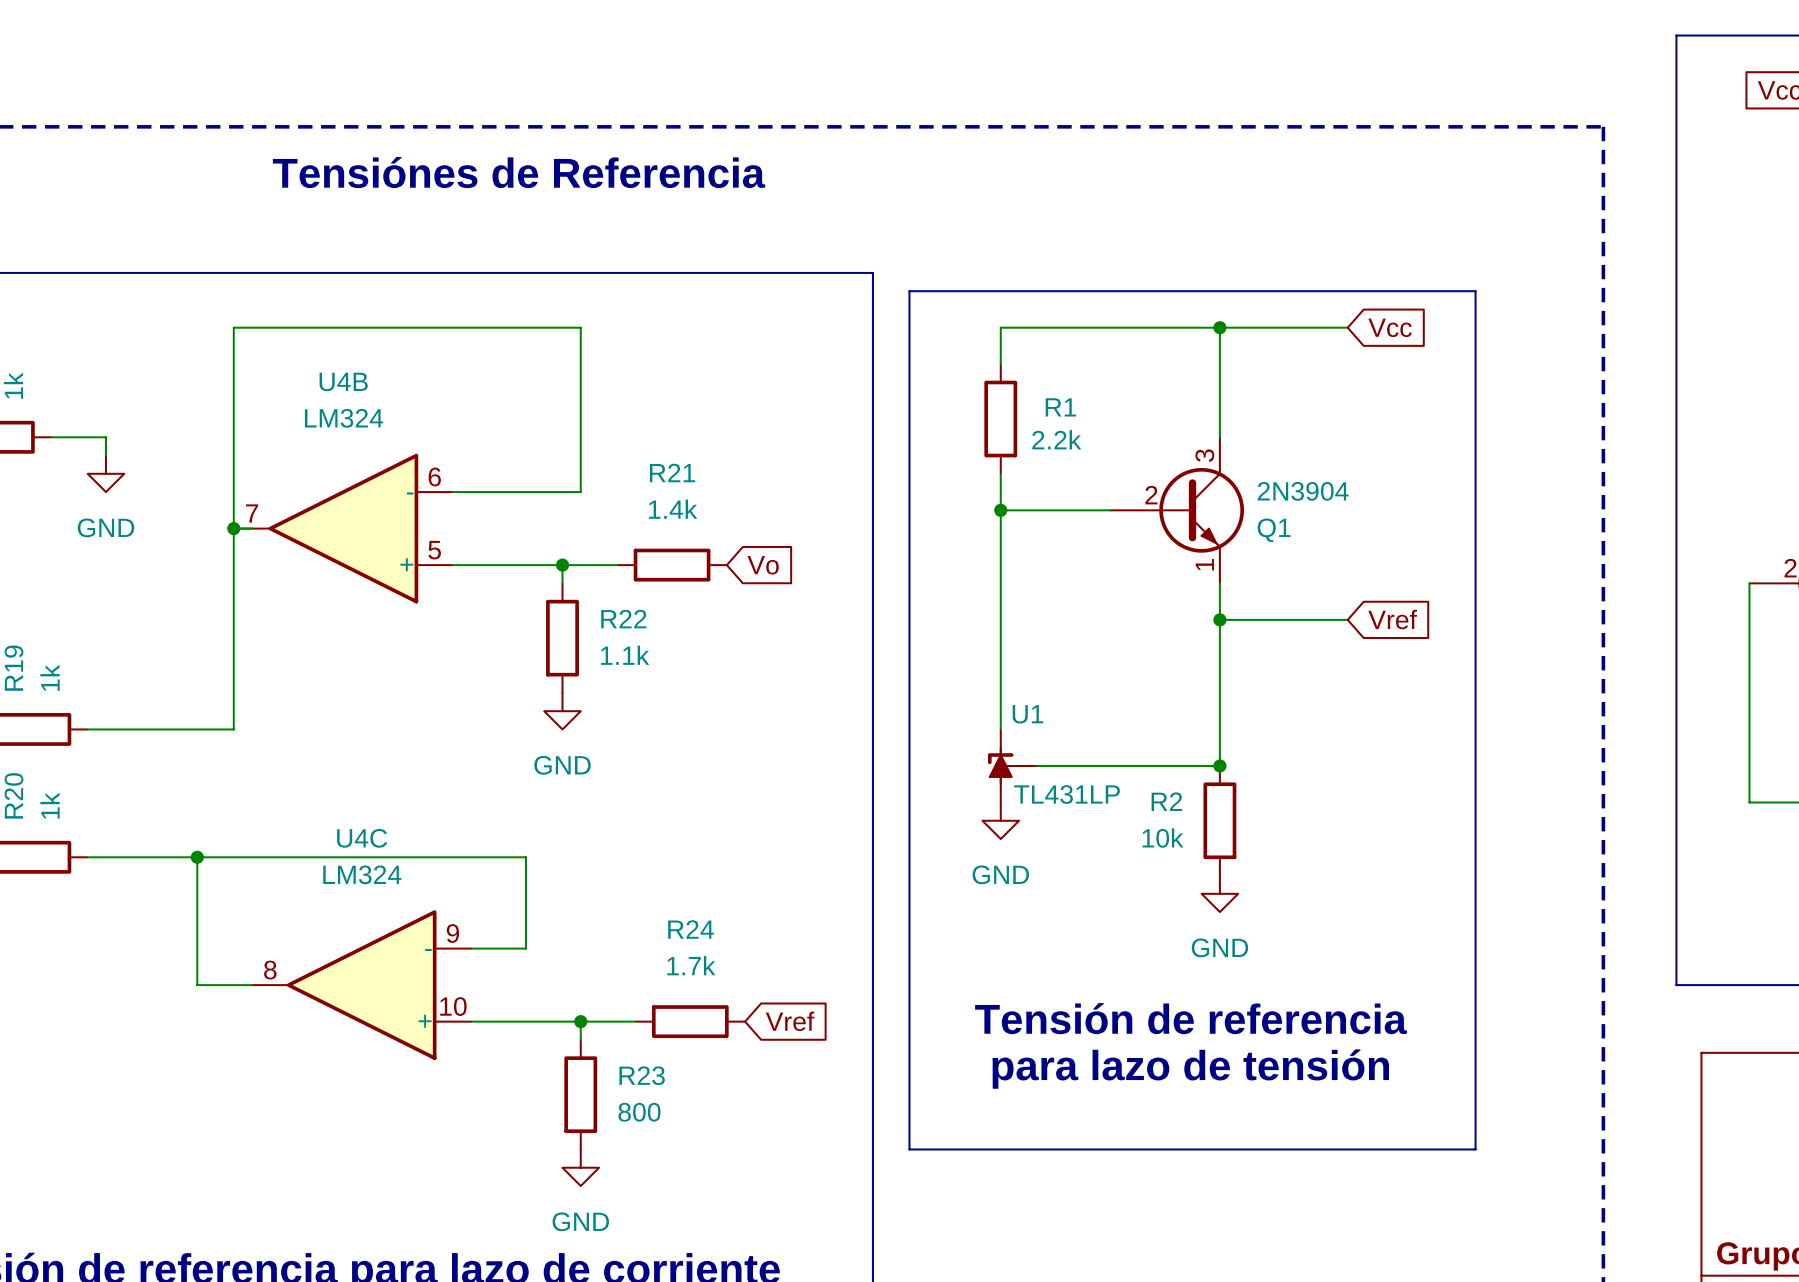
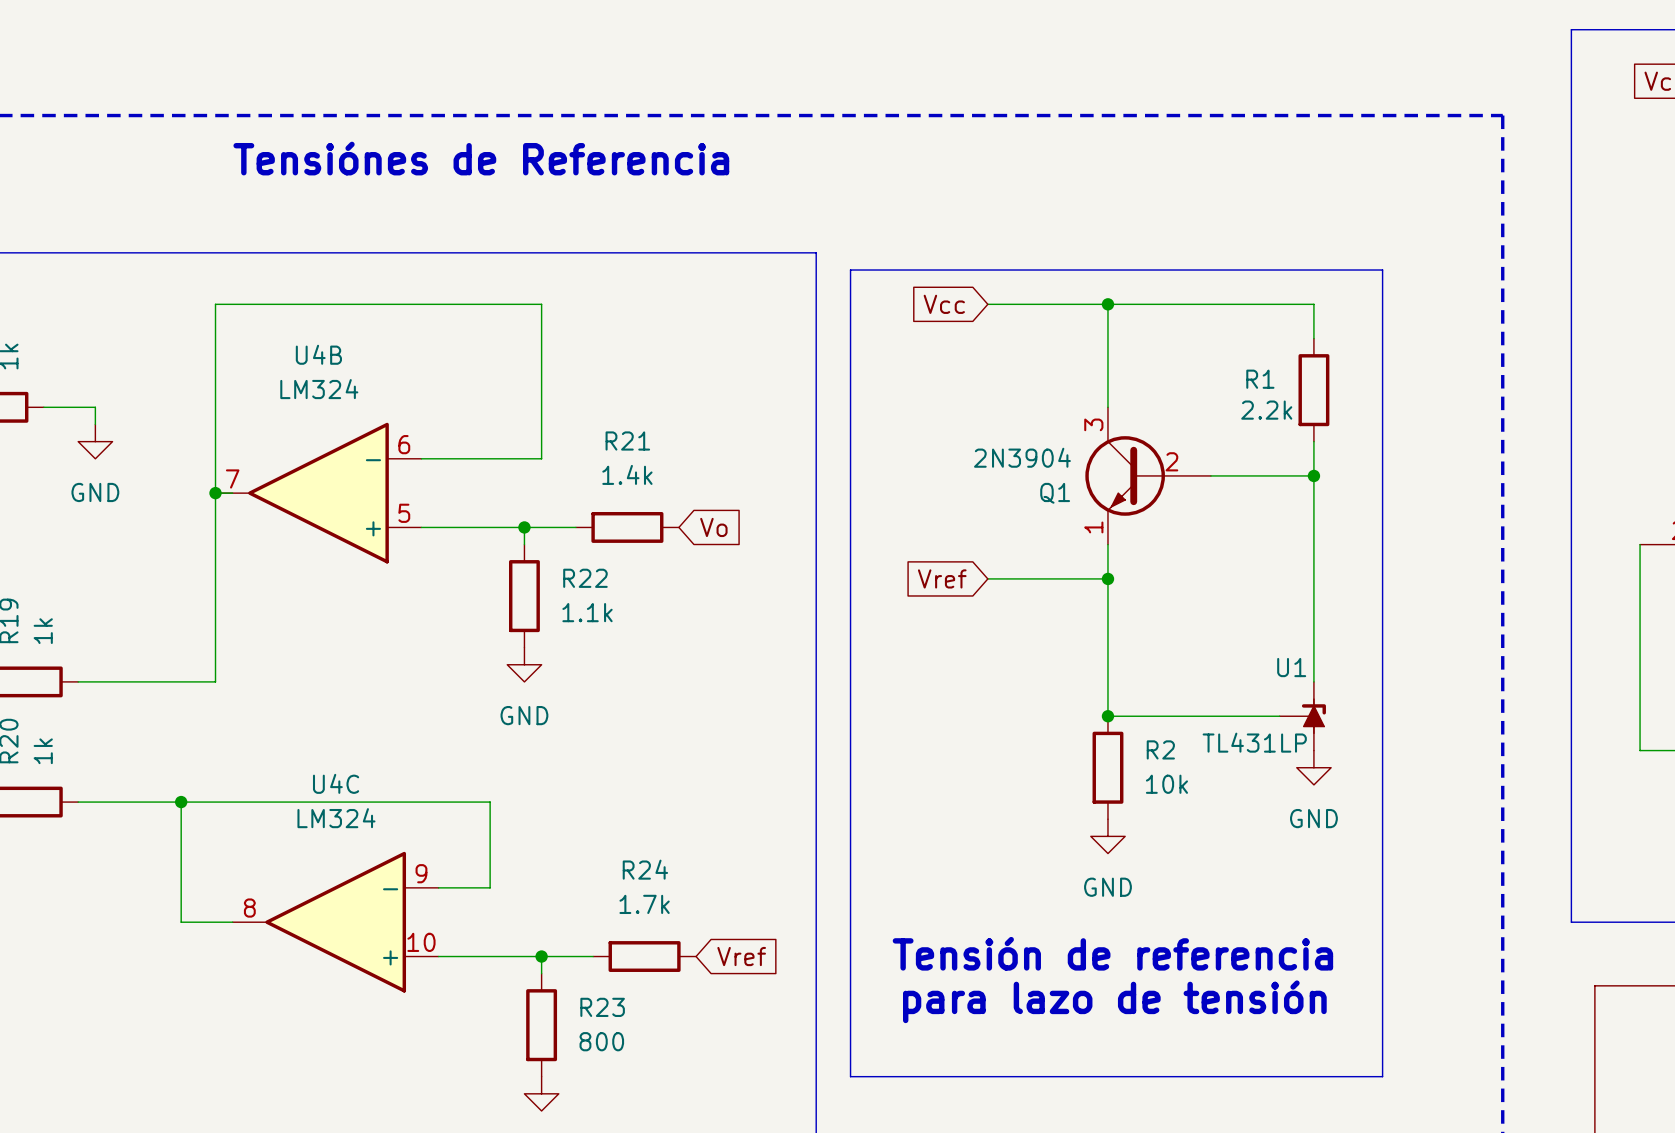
wire: (1055, 327) (1000, 327) (1000, 364) -> none
wire: (1219, 327) (1219, 437) -> (1107, 304) (1107, 407)
junction position: (1219, 327) -> (1107, 304)
wire: none -> (1262, 304) (1313, 304) (1313, 338)
global label rotation: 0° (1390, 327) -> 180° (944, 304)
global label position: Vcc (1390, 327) -> Vcc (944, 304)
R1 name position: R1 (1060, 407) -> R1 (1260, 379)
R1 position: (1000, 419) -> (1313, 390)
R1 value position: 2.2k (1056, 439) -> 2.2k (1266, 410)
wire: (1000, 473) (1000, 729) -> none
wire: none -> (1313, 441) (1313, 681)
wire: (1000, 510) (1110, 510) -> (1210, 475) (1313, 475)
junction: (1000, 510) -> none
Q1 flip: as is (1201, 510) -> left-right (1125, 475)
junction: none -> (1313, 475)
wire: (1219, 583) (1219, 765) -> (1279, 716) (1142, 716)
wire: (1219, 619) (1347, 619) -> (987, 578) (1107, 578)
junction position: (1219, 619) -> (1107, 578)
global label rotation: 0° (1392, 619) -> 180° (942, 578)
global label position: Vref (1392, 619) -> Vref (942, 578)
U1 flip: as is (1000, 765) -> left-right (1313, 716)
U1 position: (1012, 765) -> (1302, 716)
wire: (1037, 765) (1183, 765) -> (1107, 544) (1107, 716)
junction position: (1219, 765) -> (1107, 716)
R2 name position: R2 (1166, 801) -> R2 (1160, 749)
power symbol: GND (1000, 820) -> none
R2 position: (1219, 820) -> (1107, 767)
power symbol: none -> GND (1313, 767)
R2 value position: 10k (1163, 837) -> 10k (1166, 784)
power symbol position: GND (1219, 893) -> GND (1107, 836)

